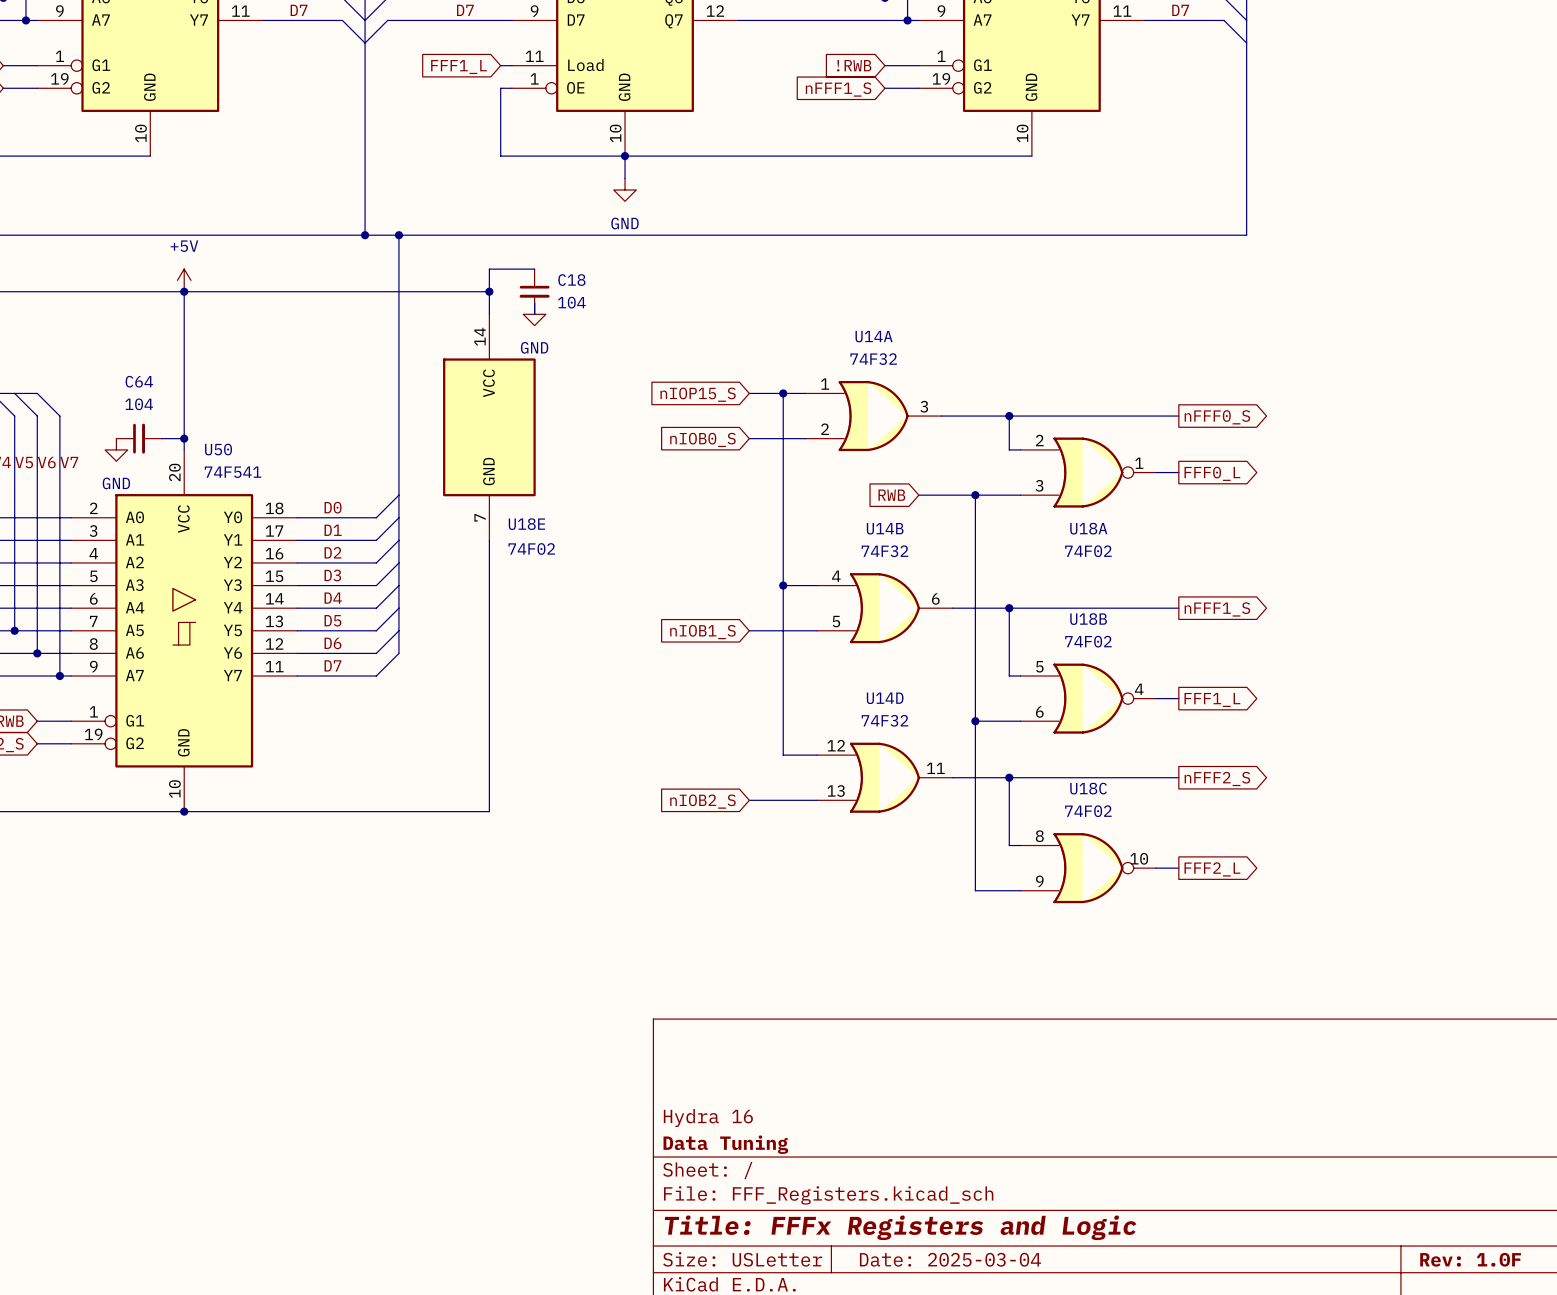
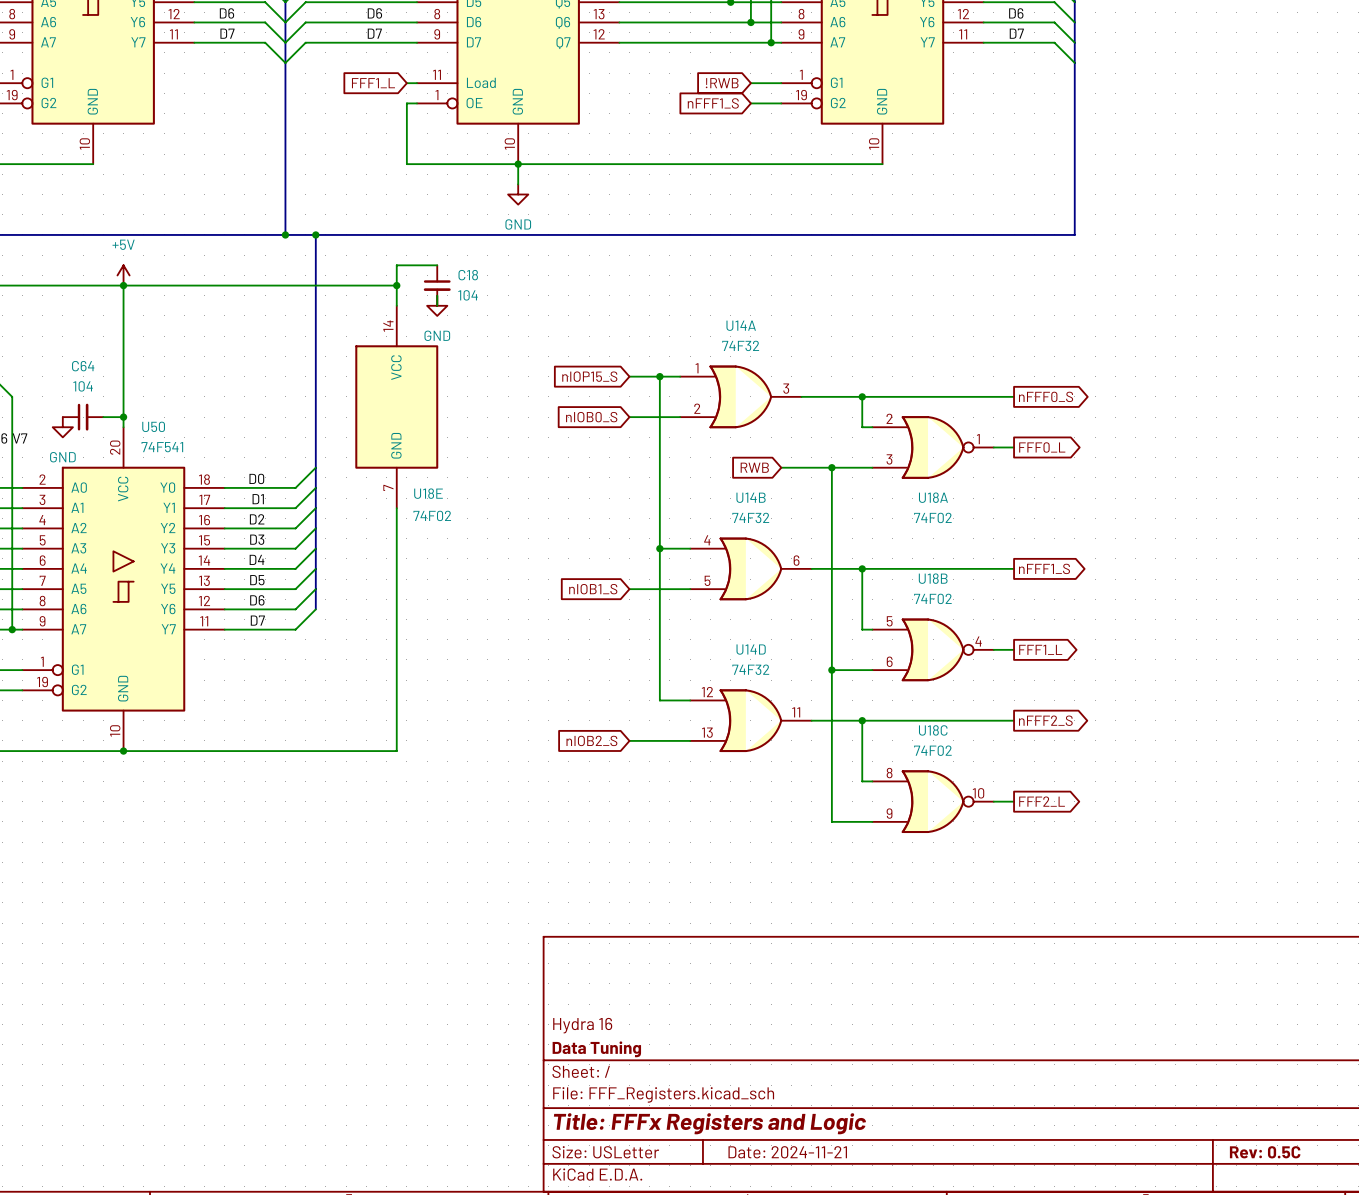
title block: Date: 2025-03-04 (950, 1259) -> Date: 2024-11-21 (787, 1152)
title block: Rev: 1.0F (1470, 1259) -> Rev: 0.5C (1265, 1152)

